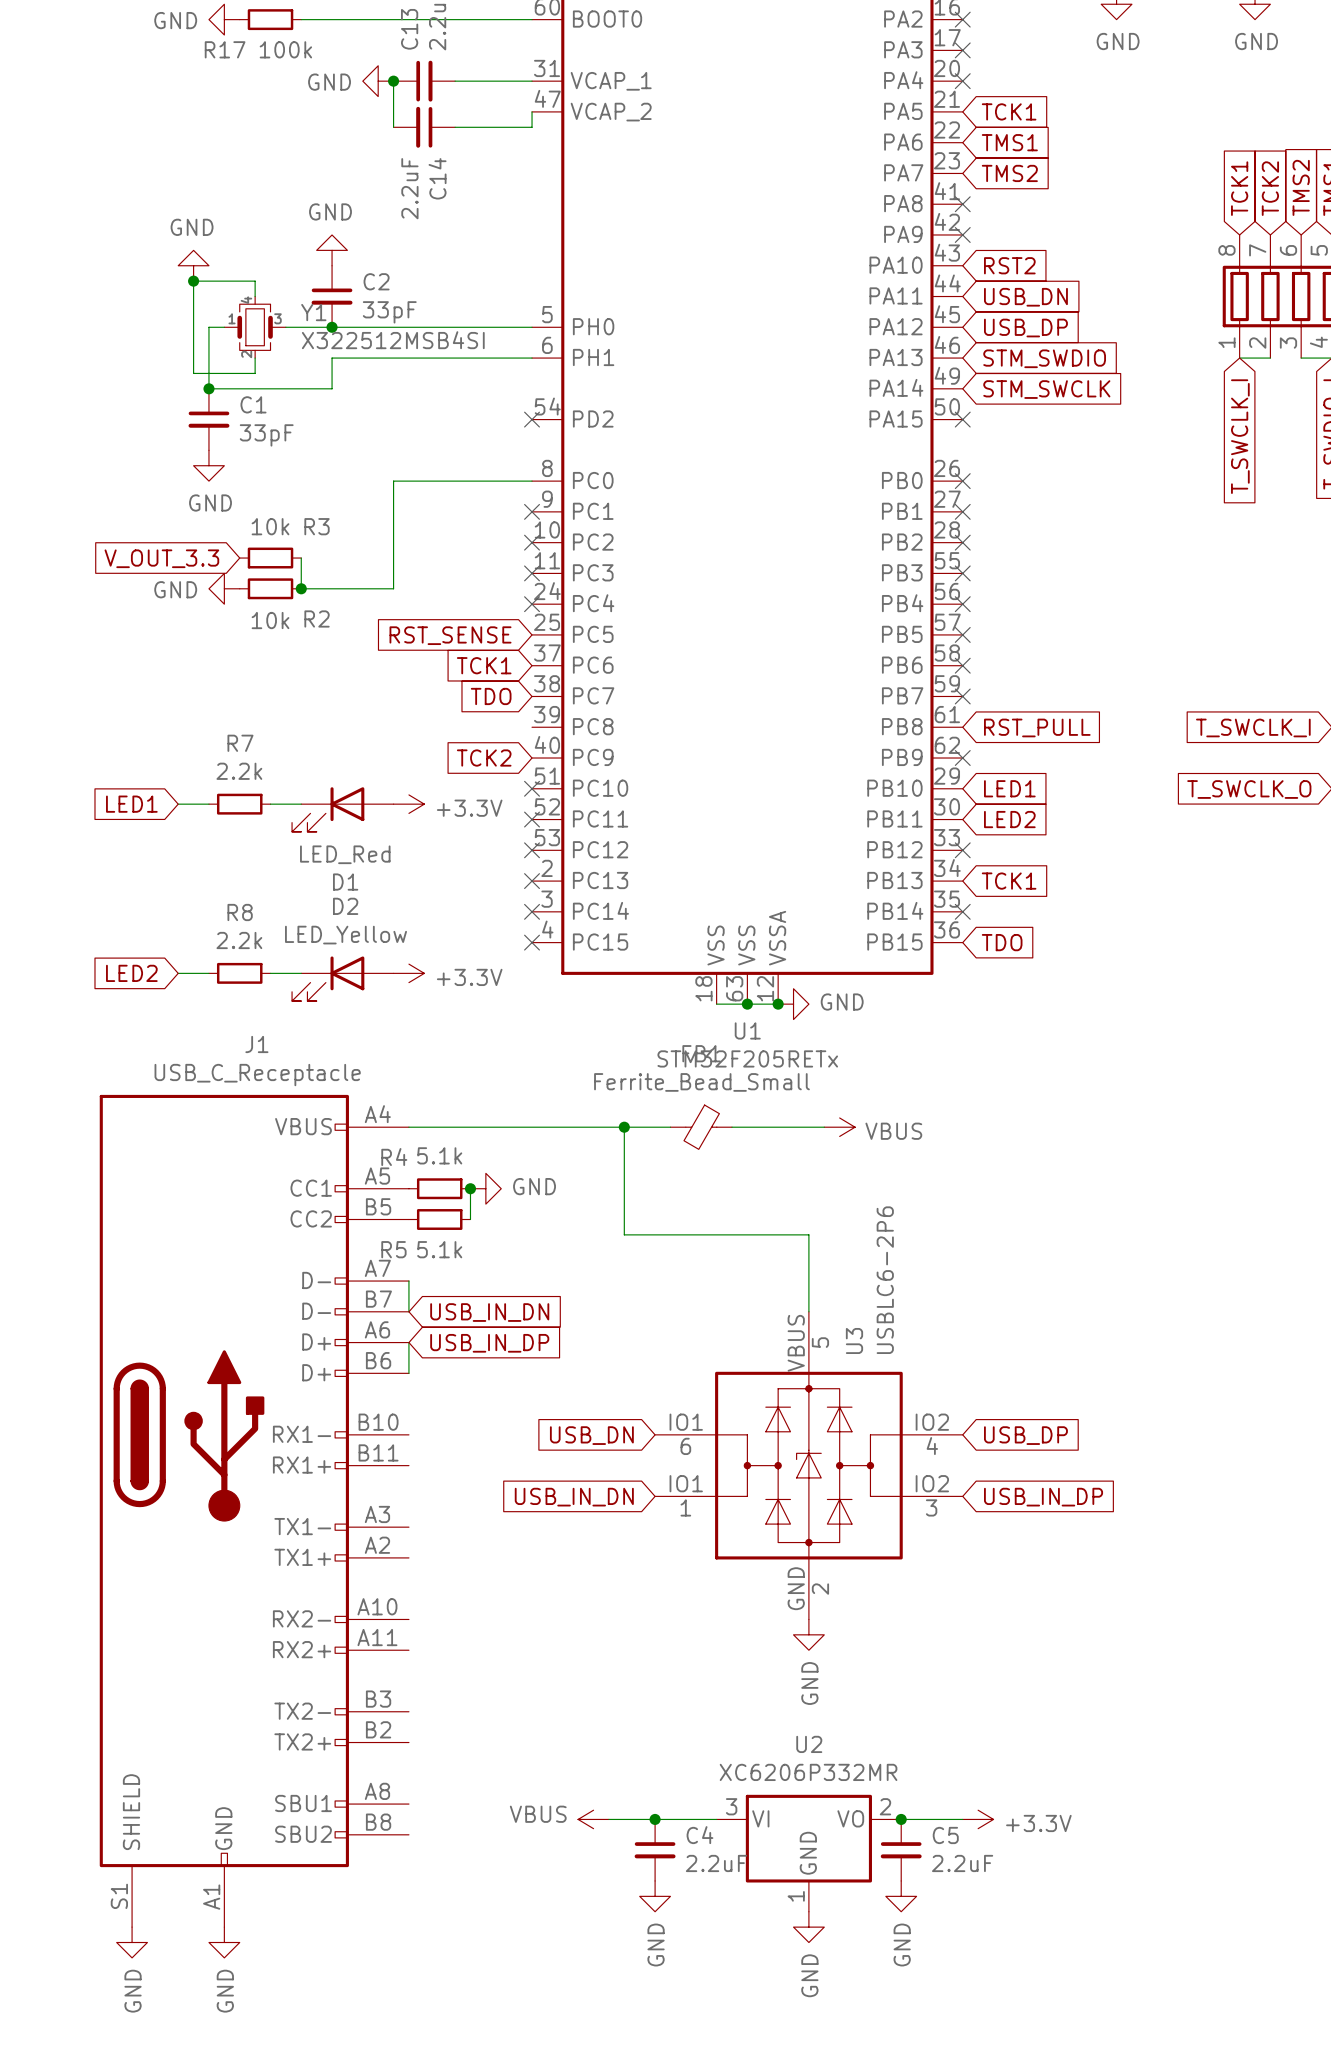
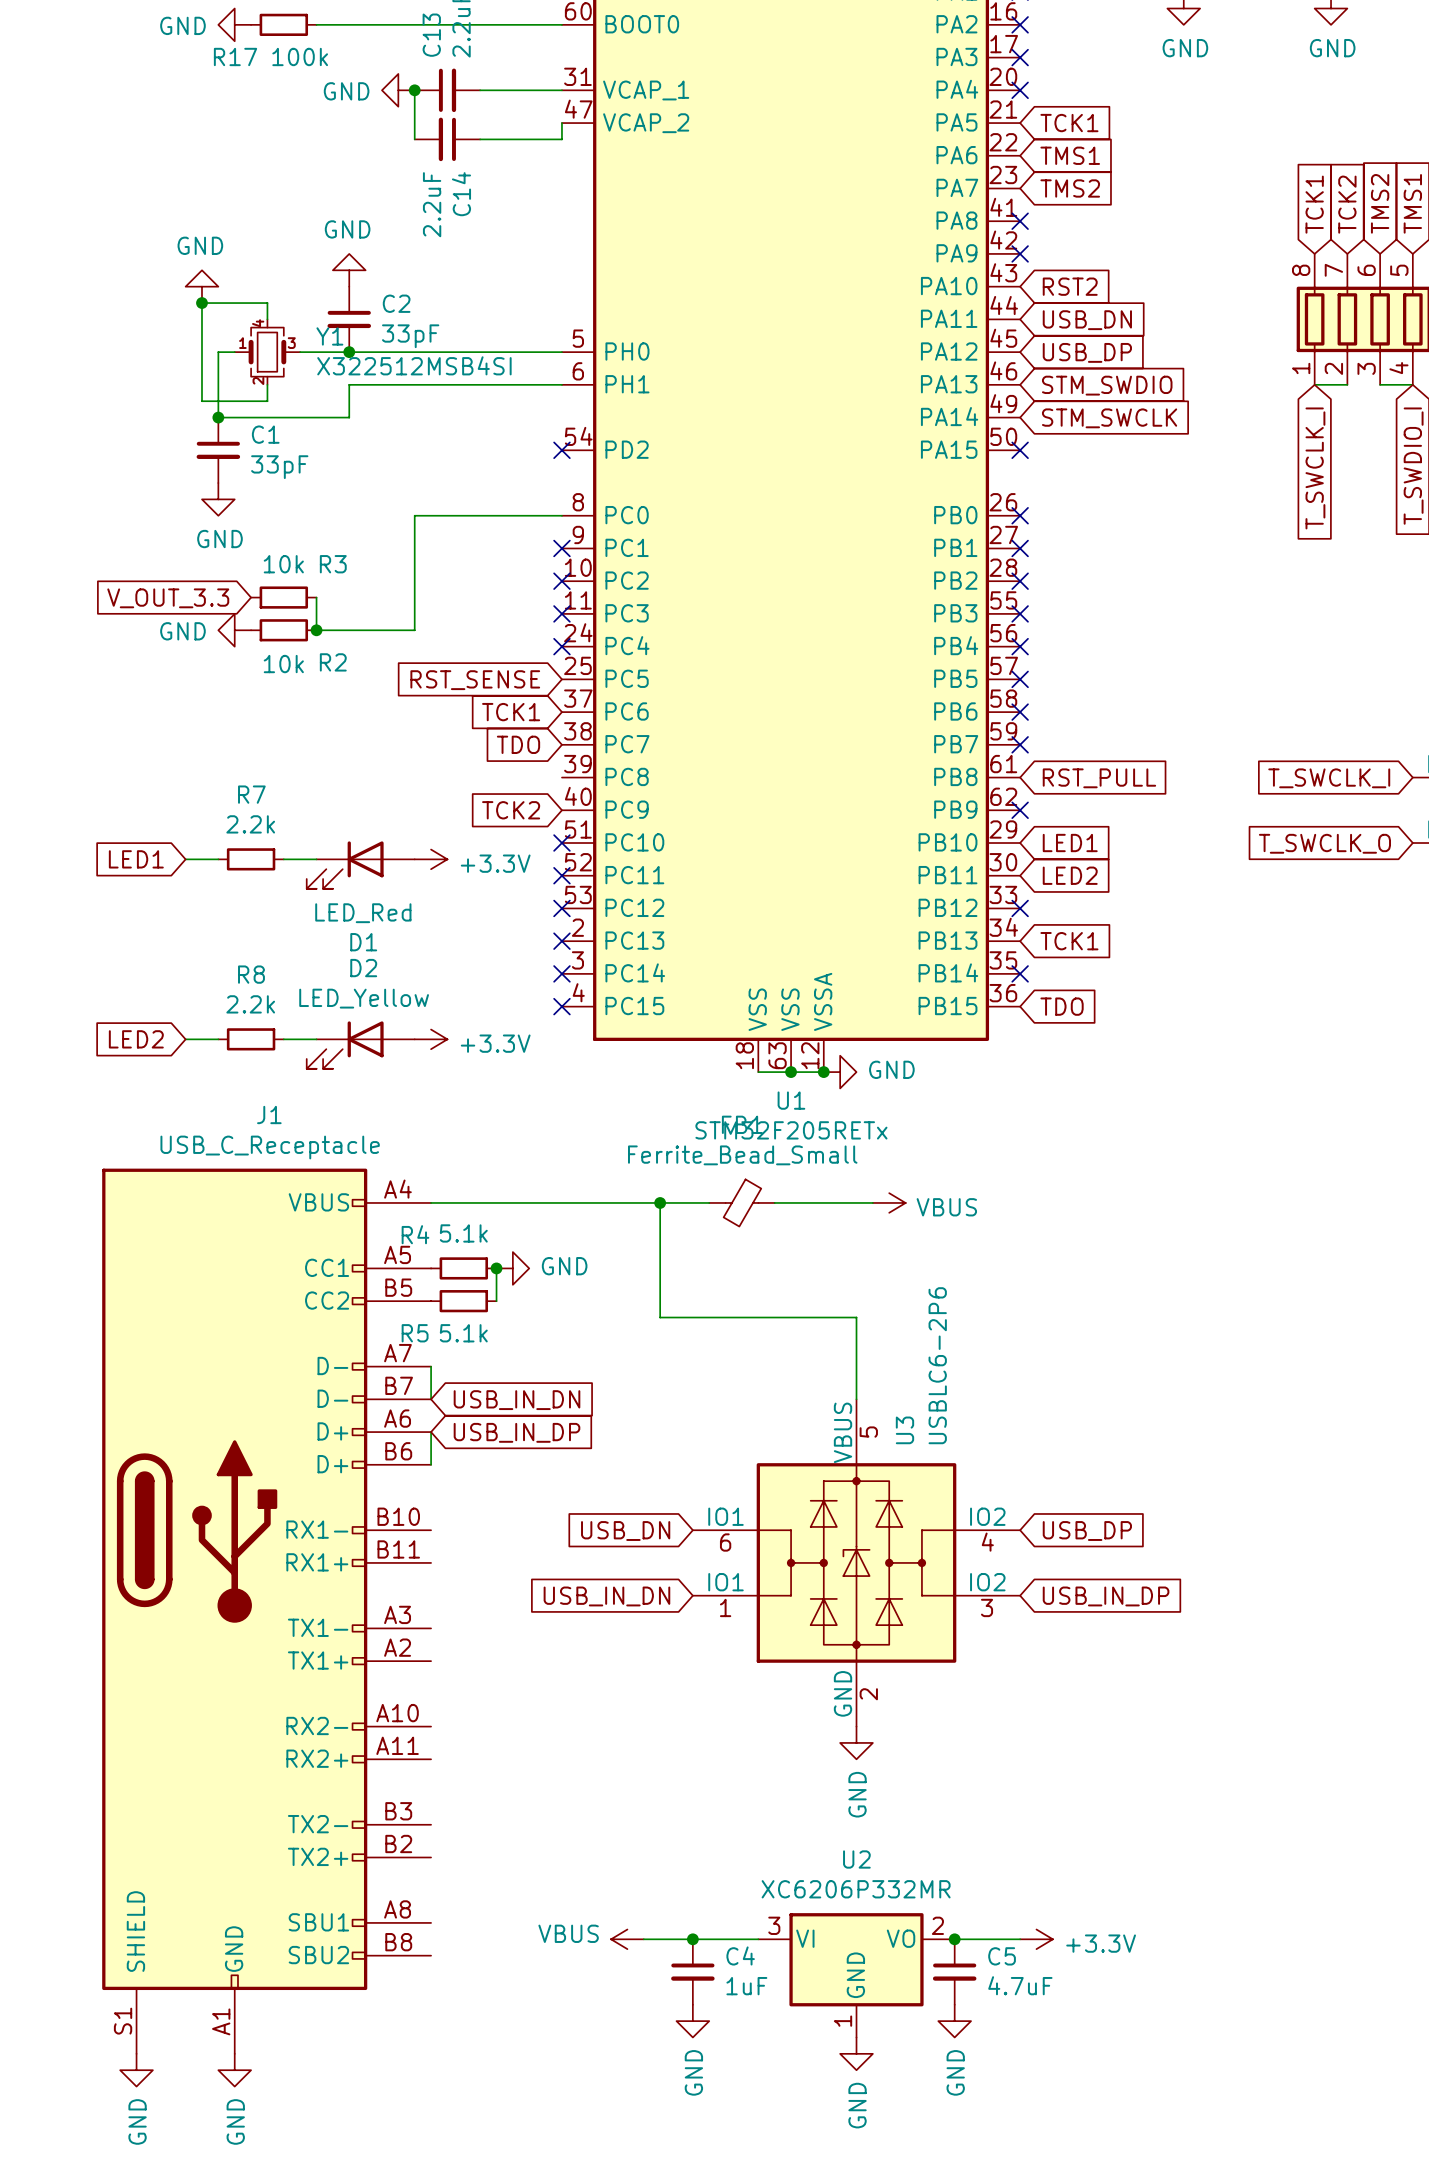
C4 value: 2.2uF (716, 1863) -> 1uF (746, 1986)
C5 value: 2.2uF (962, 1863) -> 4.7uF (1020, 1985)

